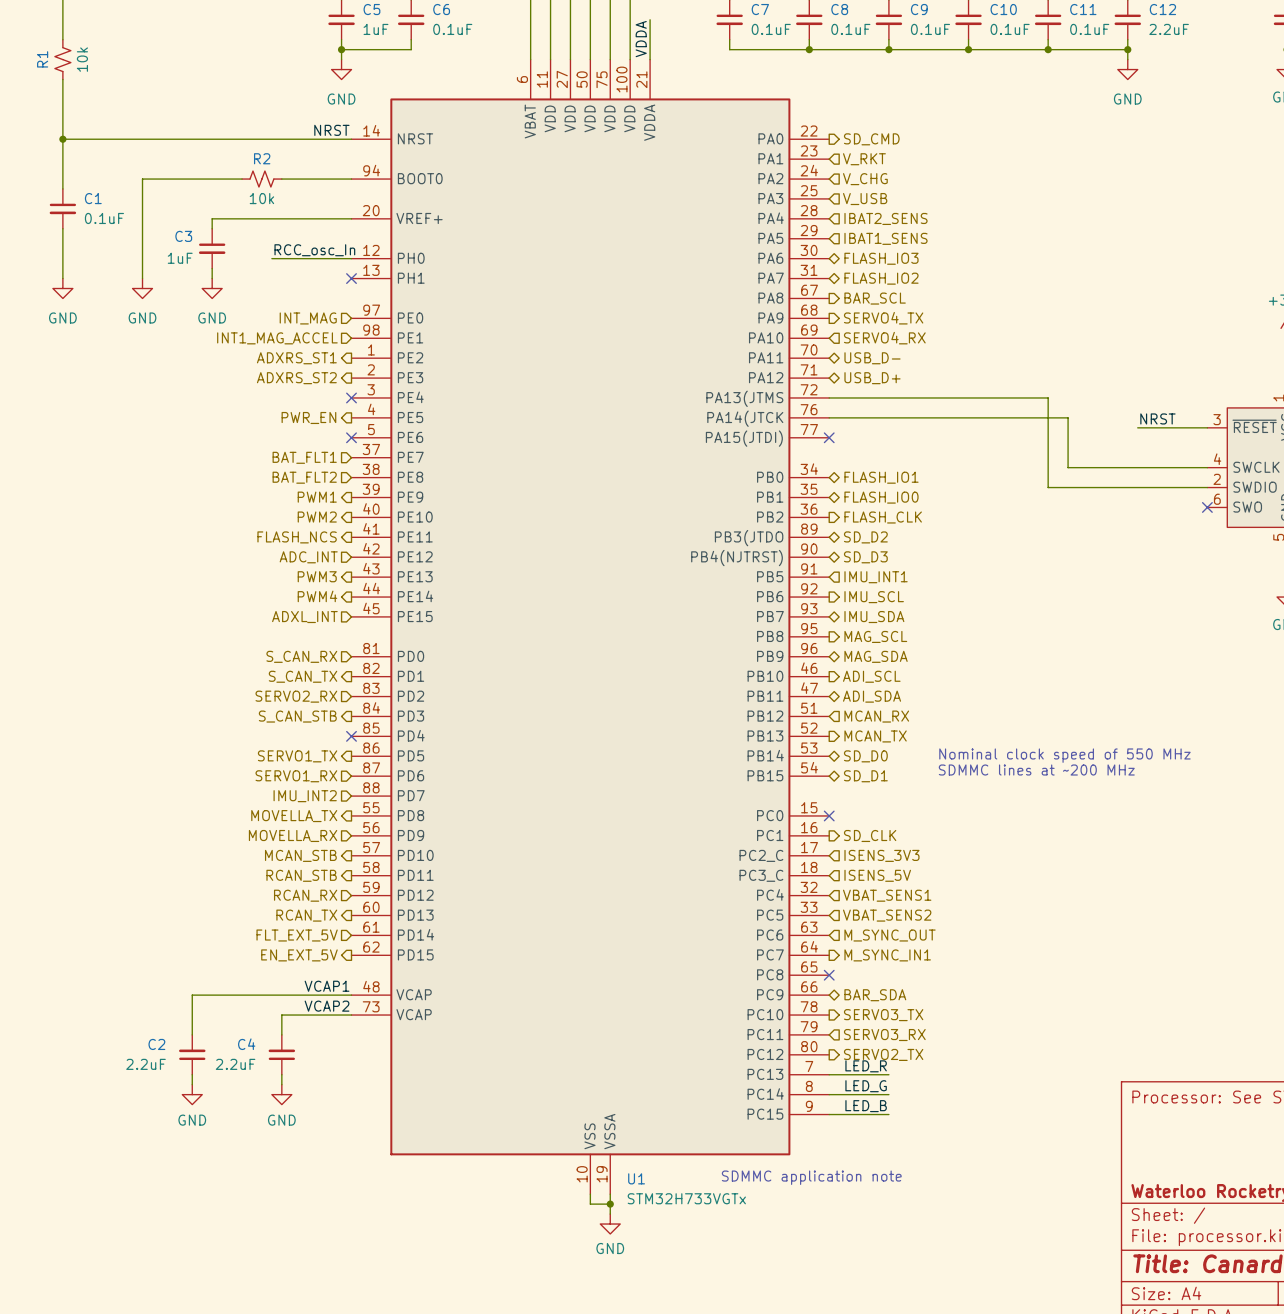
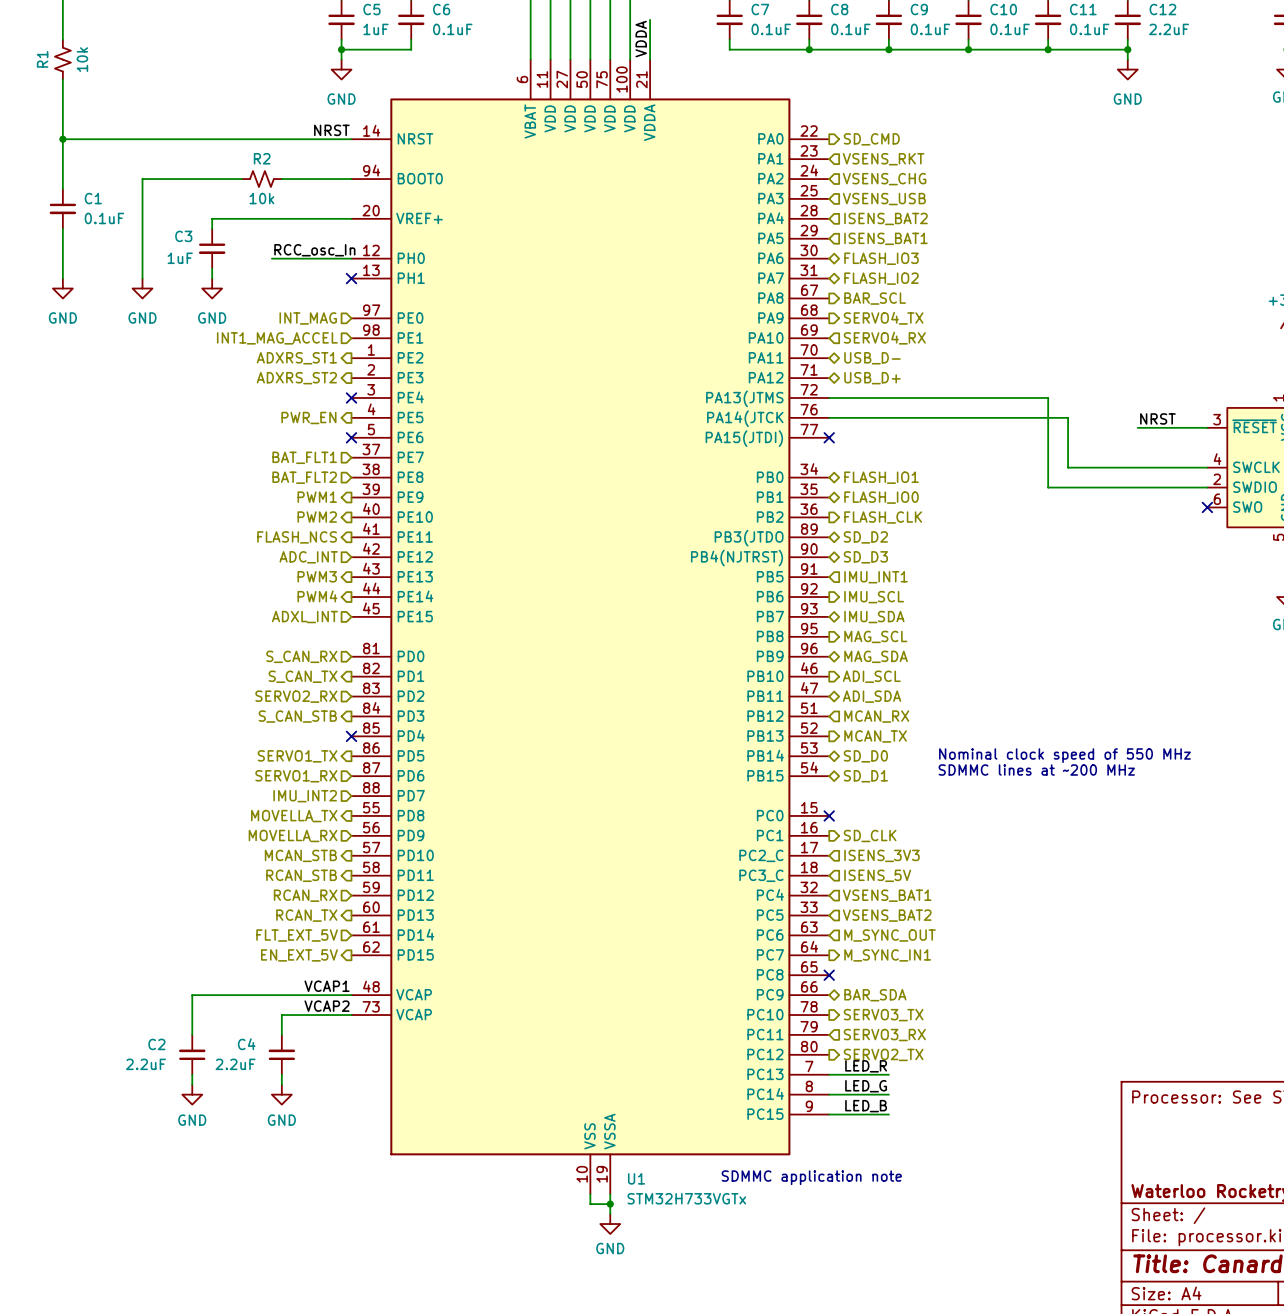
hierarchical label: V_RKT (864, 159) -> VSENS_RKT (883, 159)
hierarchical label: V_CHG (865, 179) -> VSENS_CHG (884, 179)
hierarchical label: V_USB (865, 199) -> VSENS_USB (884, 199)
hierarchical label: IBAT2_SENS (886, 218) -> ISENS_BAT2 (886, 218)
hierarchical label: IBAT1_SENS (886, 238) -> ISENS_BAT1 (886, 238)
hierarchical label: VBAT_SENS1 (887, 895) -> VSENS_BAT1 (887, 895)
hierarchical label: VBAT_SENS2 (887, 915) -> VSENS_BAT2 (887, 915)

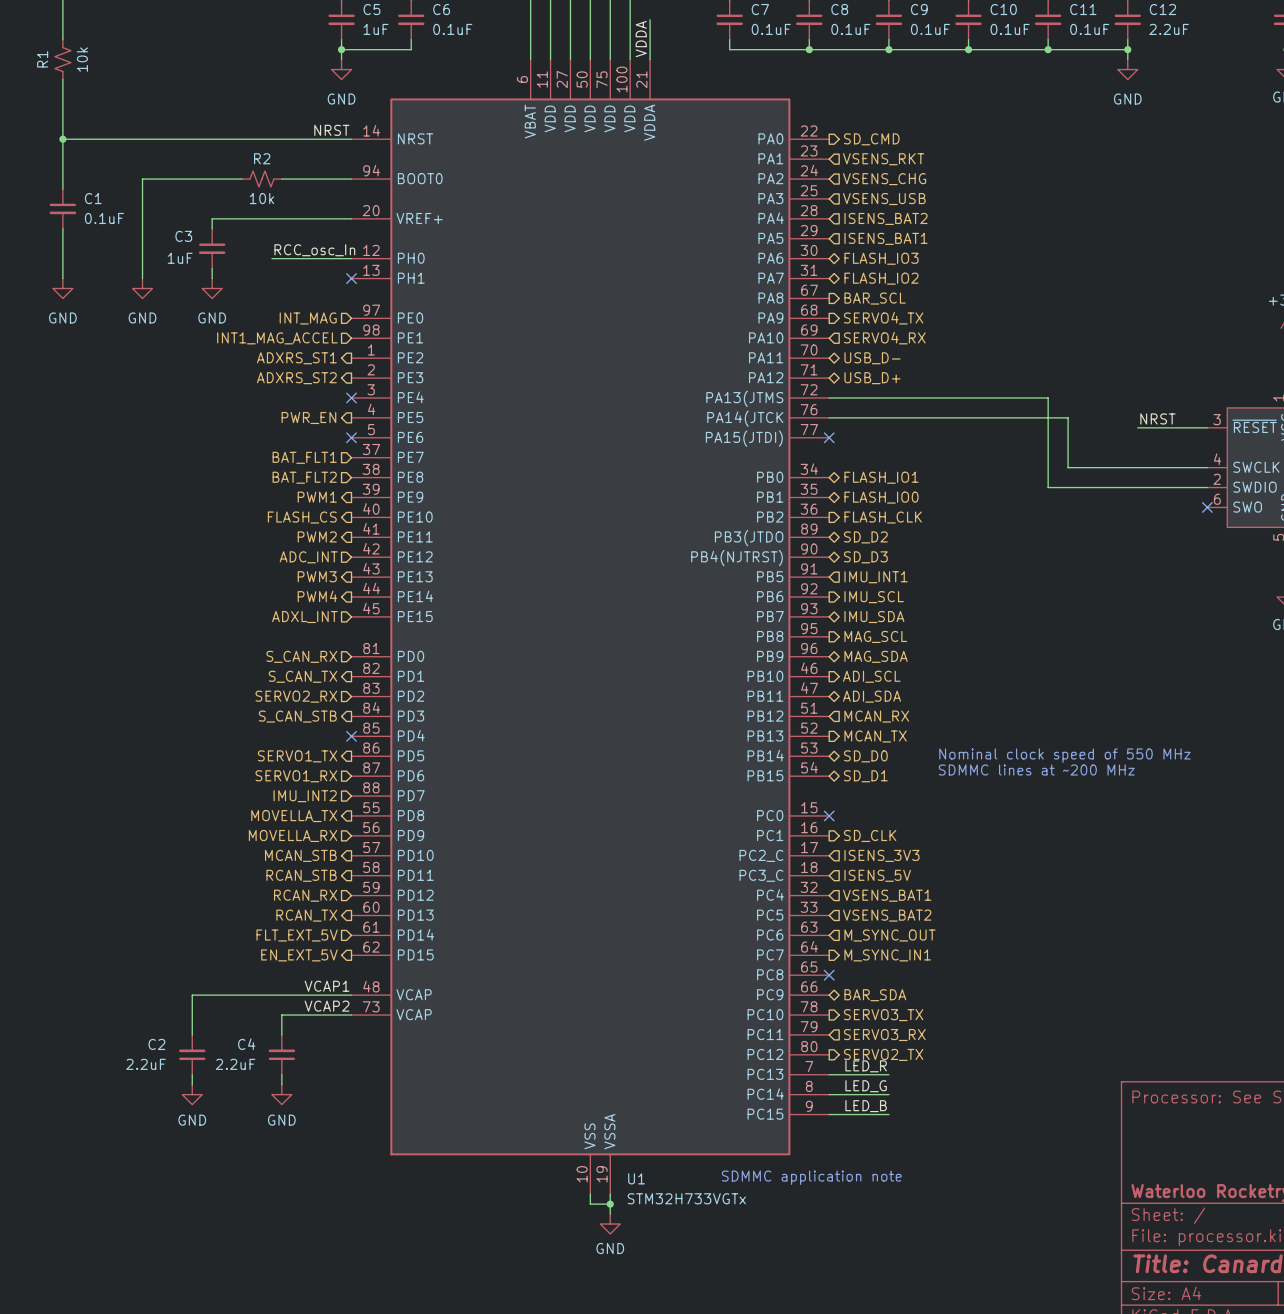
hierarchical label: PWM2 (317, 517) -> FLASH_CS (302, 517)
hierarchical label: FLASH_NCS (297, 537) -> PWM2 (317, 536)

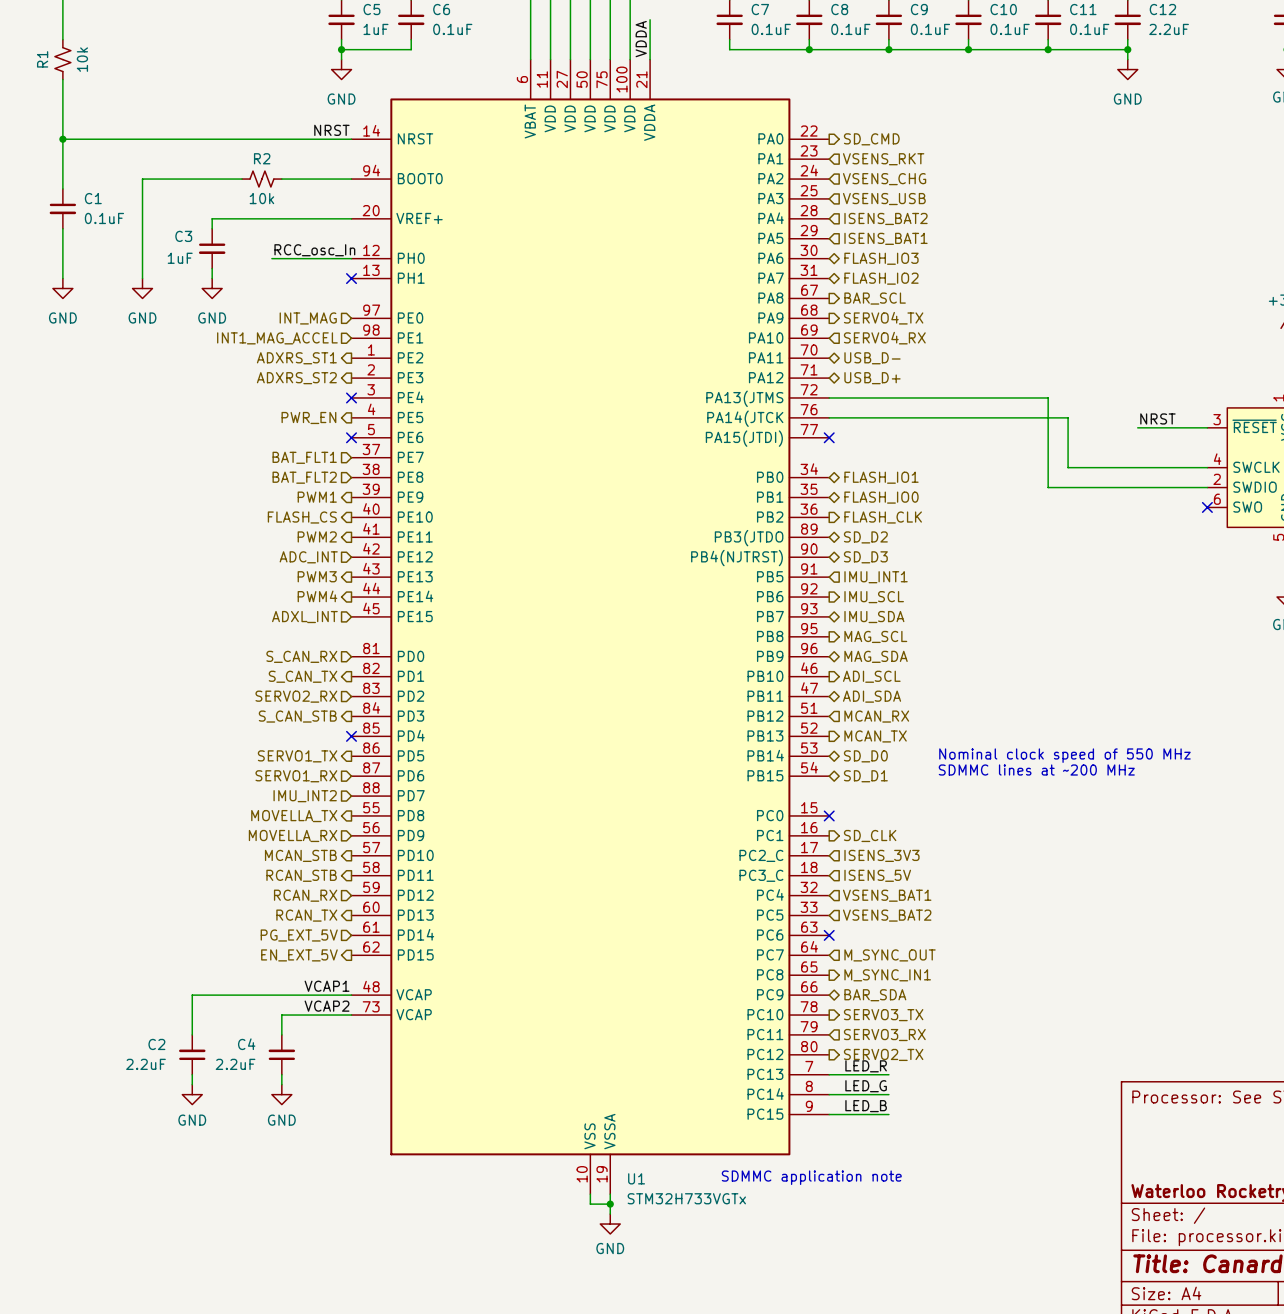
hierarchical label: FLT_EXT_5V (297, 935) -> PG_EXT_5V (299, 935)
hierarchical label: M_SYNC_OUT (890, 935) -> none
hierarchical label shape: output (887, 955) -> input (890, 955)
hierarchical label: M_SYNC_IN1 (887, 955) -> M_SYNC_OUT (890, 955)
no-connect mark position: (829, 975) -> (829, 935)
hierarchical label: none -> M_SYNC_IN1 (887, 975)

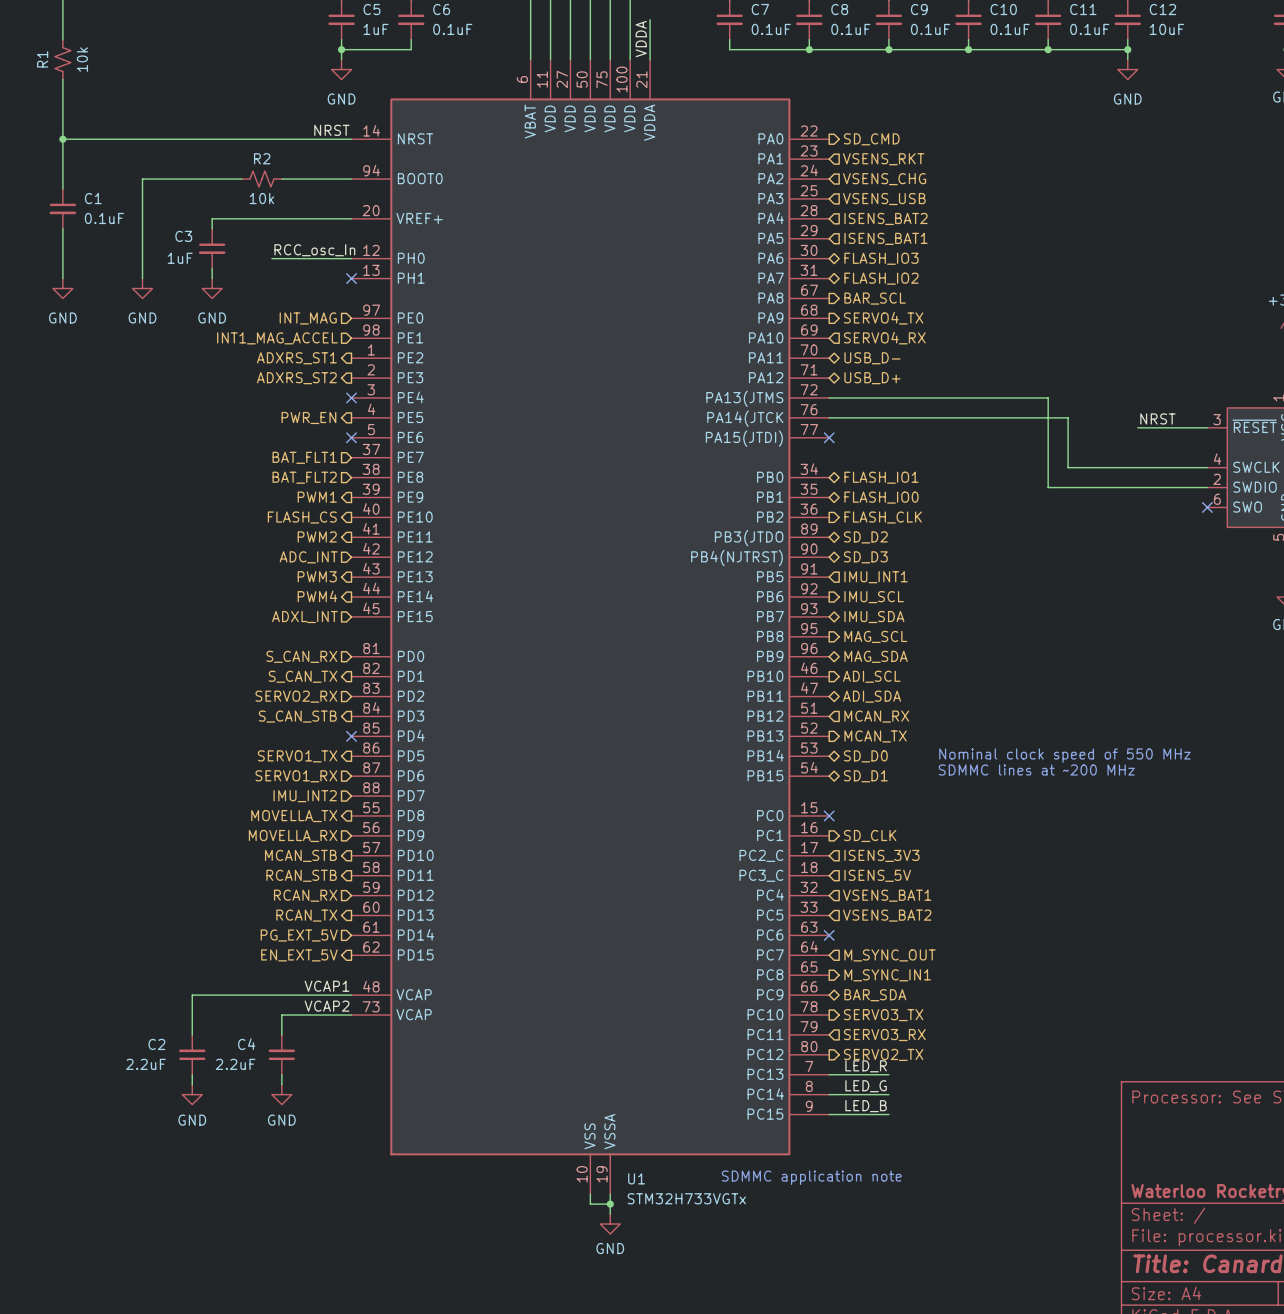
C12 value: 2.2uF (1169, 29) -> 10uF (1166, 29)

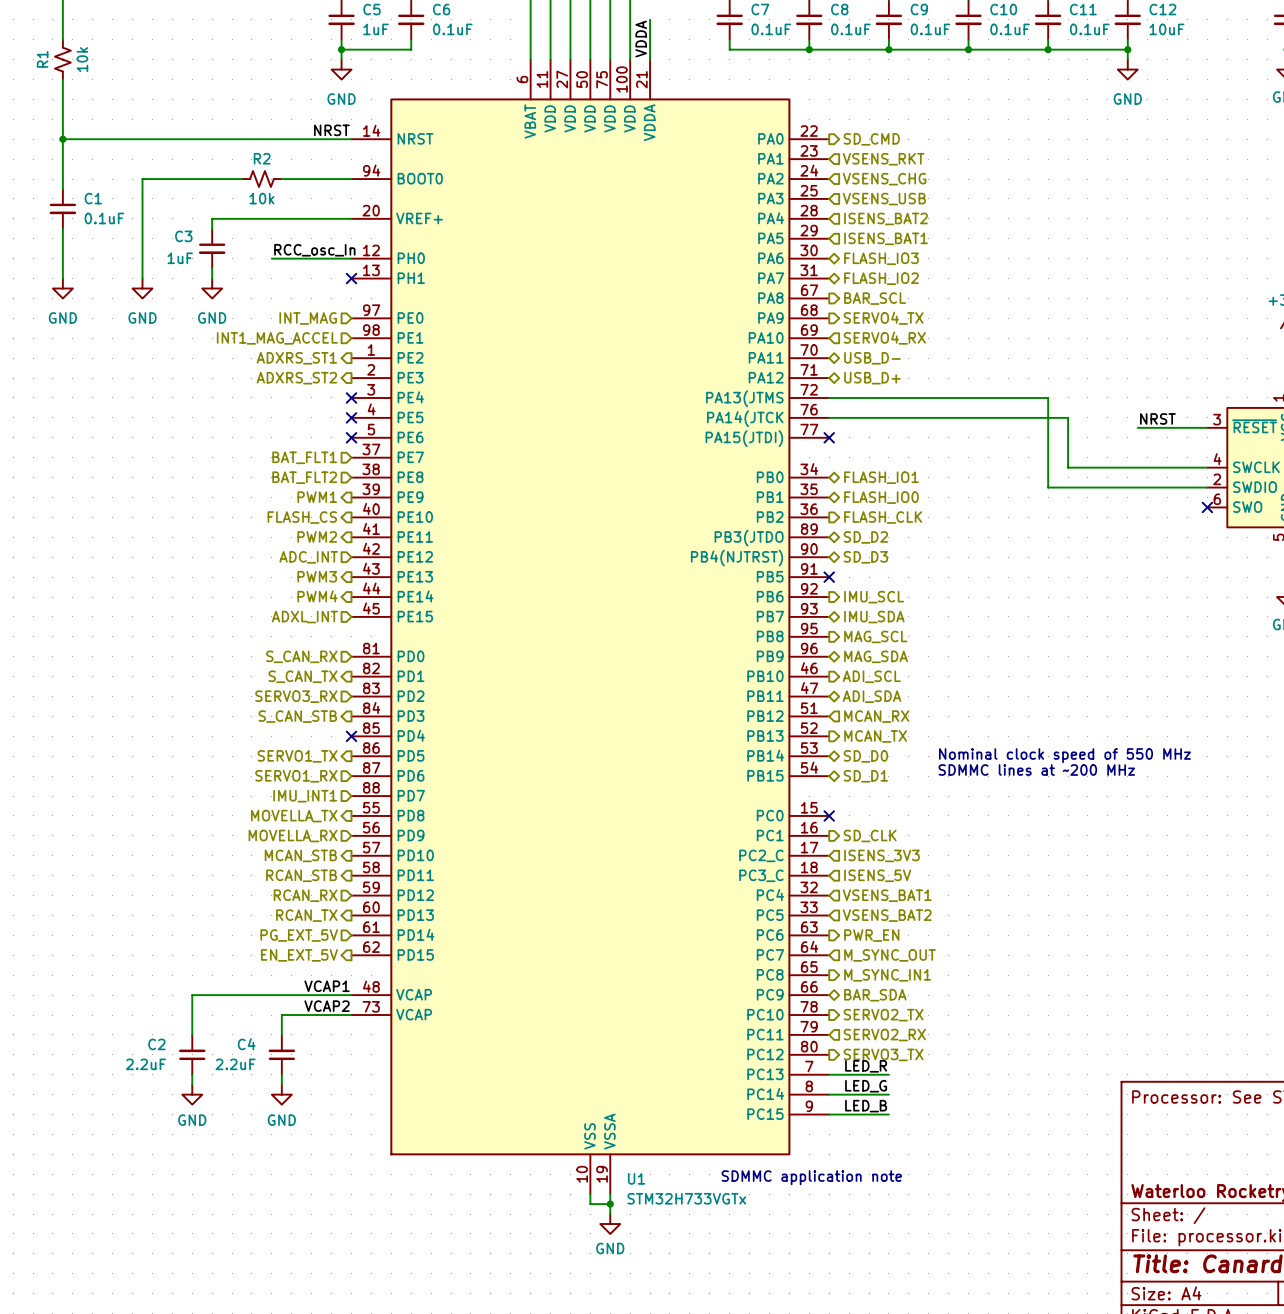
hierarchical label: PWR_EN (308, 417) -> none
no-connect mark: none -> (351, 417)
no-connect mark: none -> (829, 577)
hierarchical label: IMU_INT1 (876, 577) -> none
hierarchical label: SERVO2_RX (296, 696) -> SERVO3_RX (296, 696)
hierarchical label: IMU_INT2 (305, 796) -> IMU_INT1 (305, 796)
no-connect mark: (829, 935) -> none
hierarchical label: none -> PWR_EN (871, 935)
hierarchical label: SERVO3_TX (883, 1015) -> SERVO2_TX (883, 1015)
hierarchical label: SERVO3_RX (884, 1035) -> SERVO2_RX (884, 1035)
hierarchical label: SERVO2_TX (883, 1054) -> SERVO3_TX (883, 1054)

